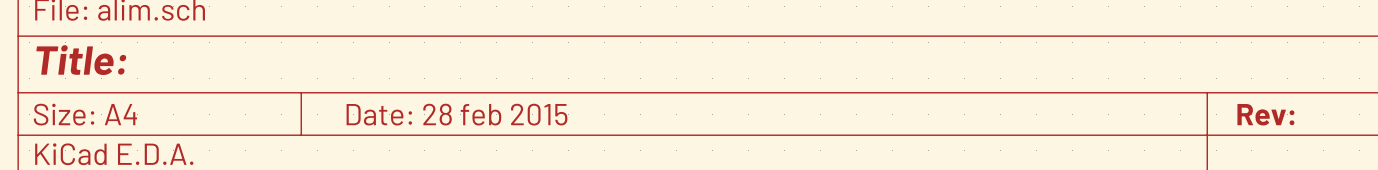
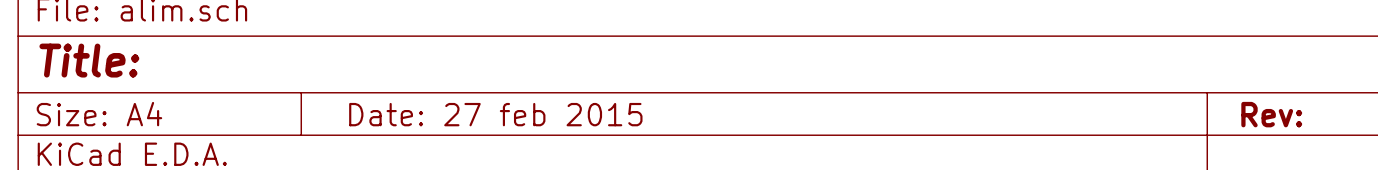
title block: Date: 28 feb 2015 (456, 114) -> Date: 27 feb 2015 (495, 114)

